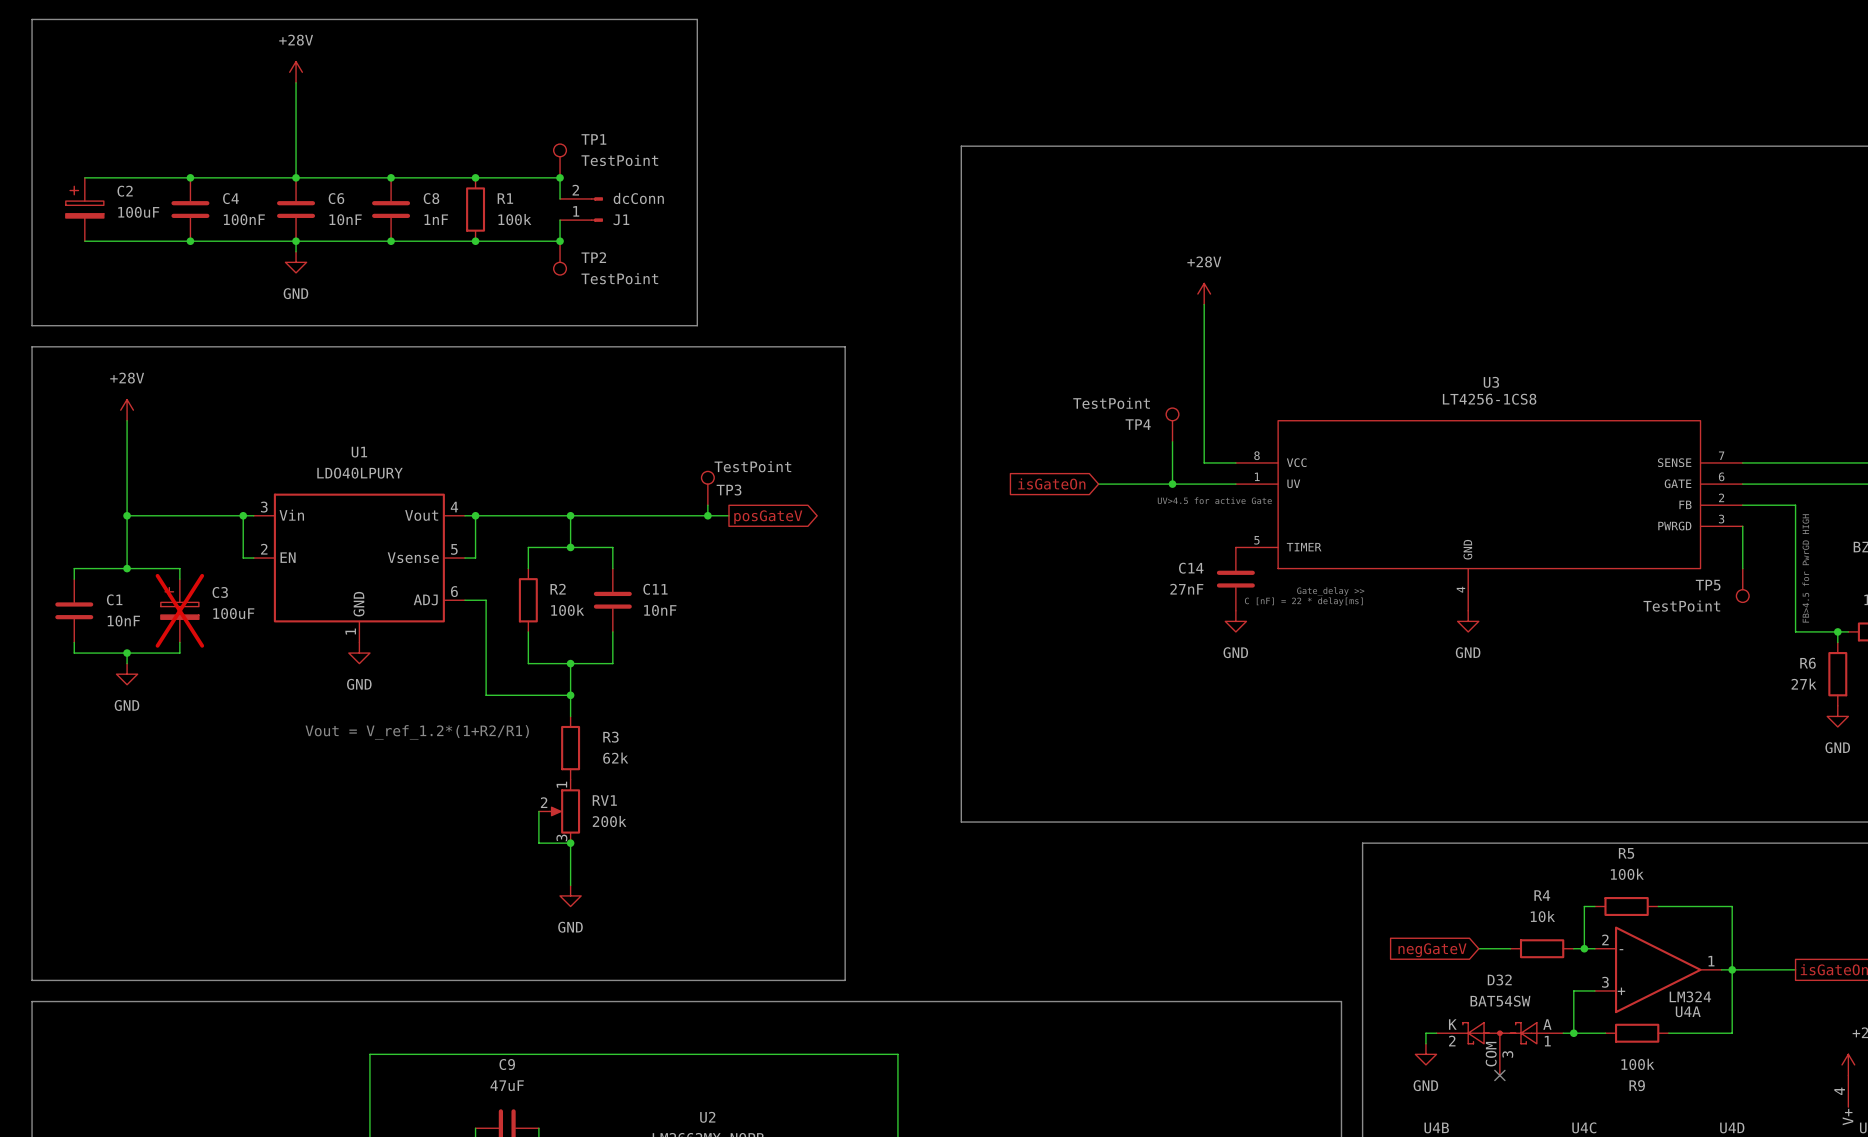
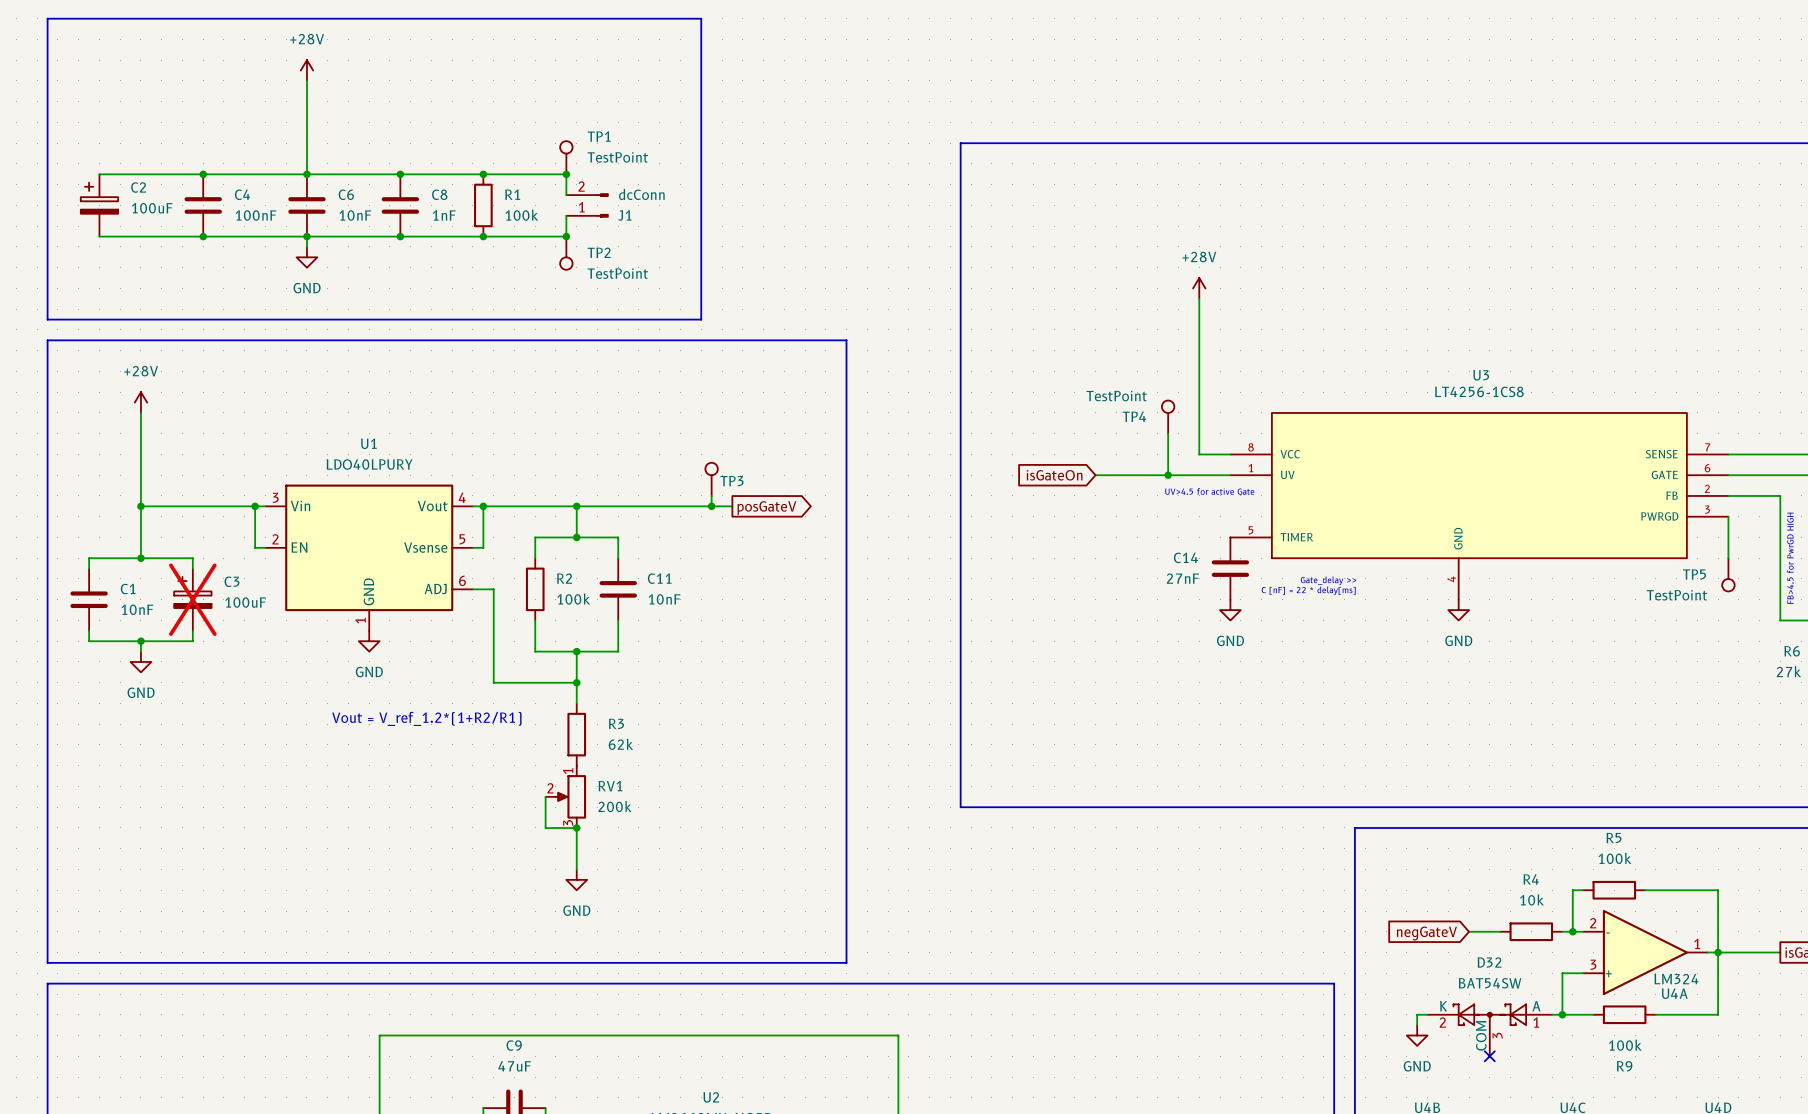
TP3 value: TestPoint (752, 466) -> none

